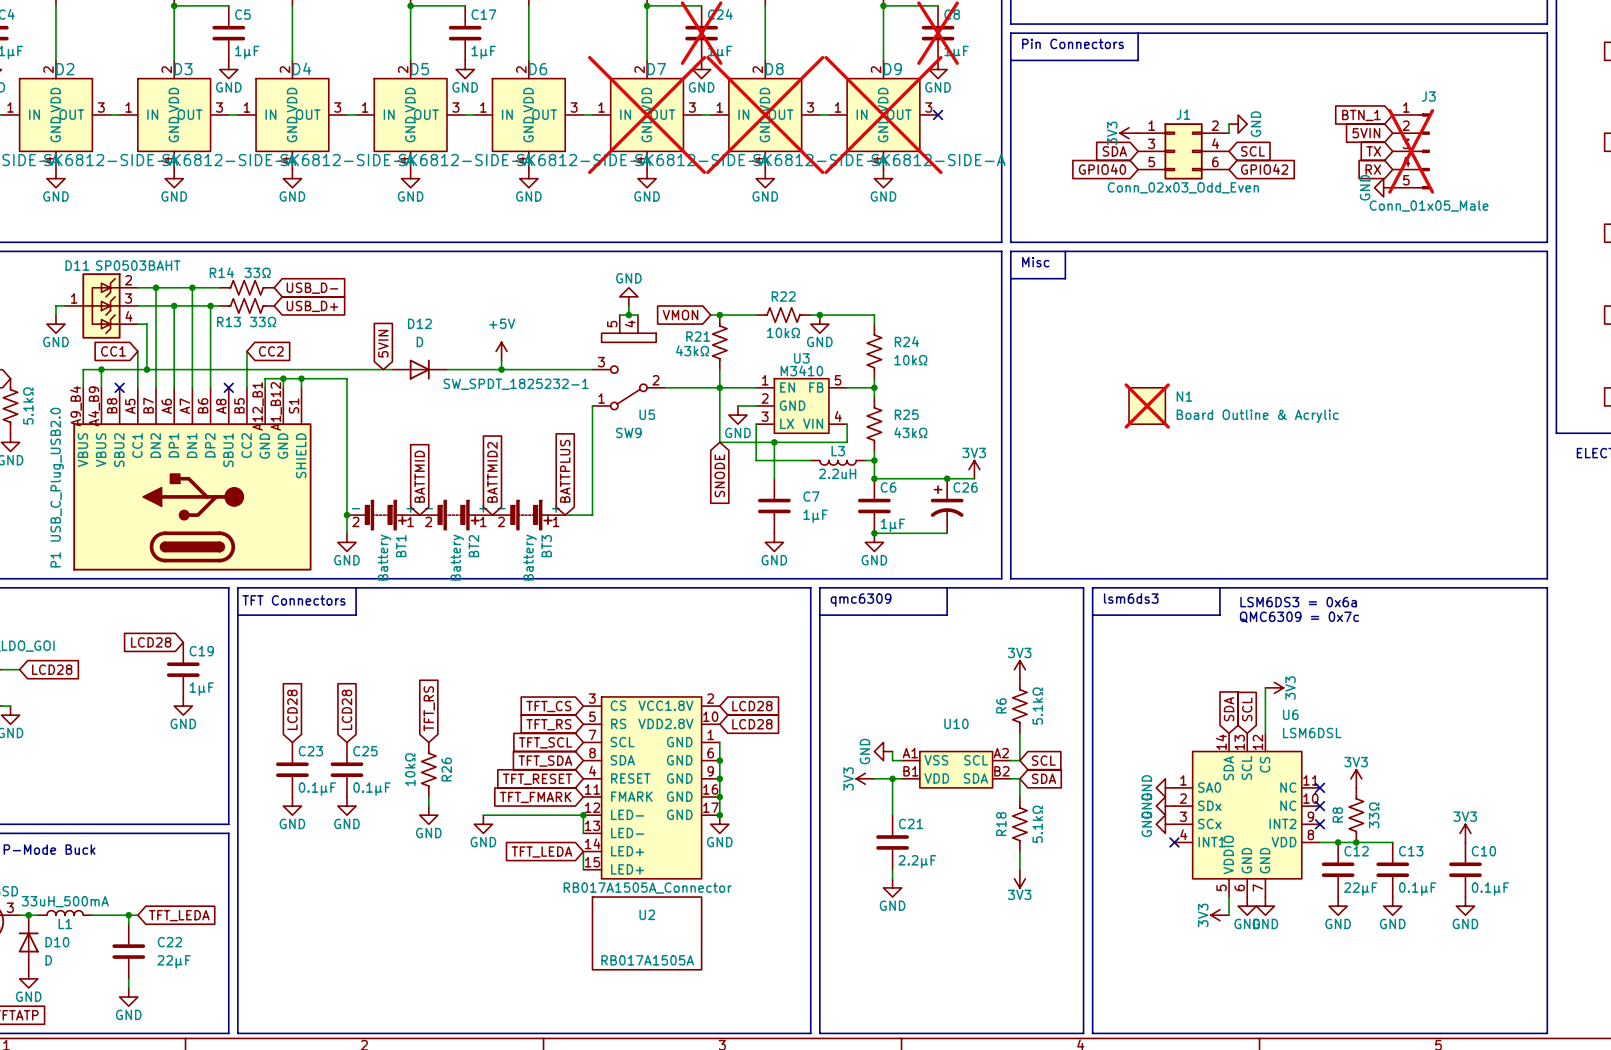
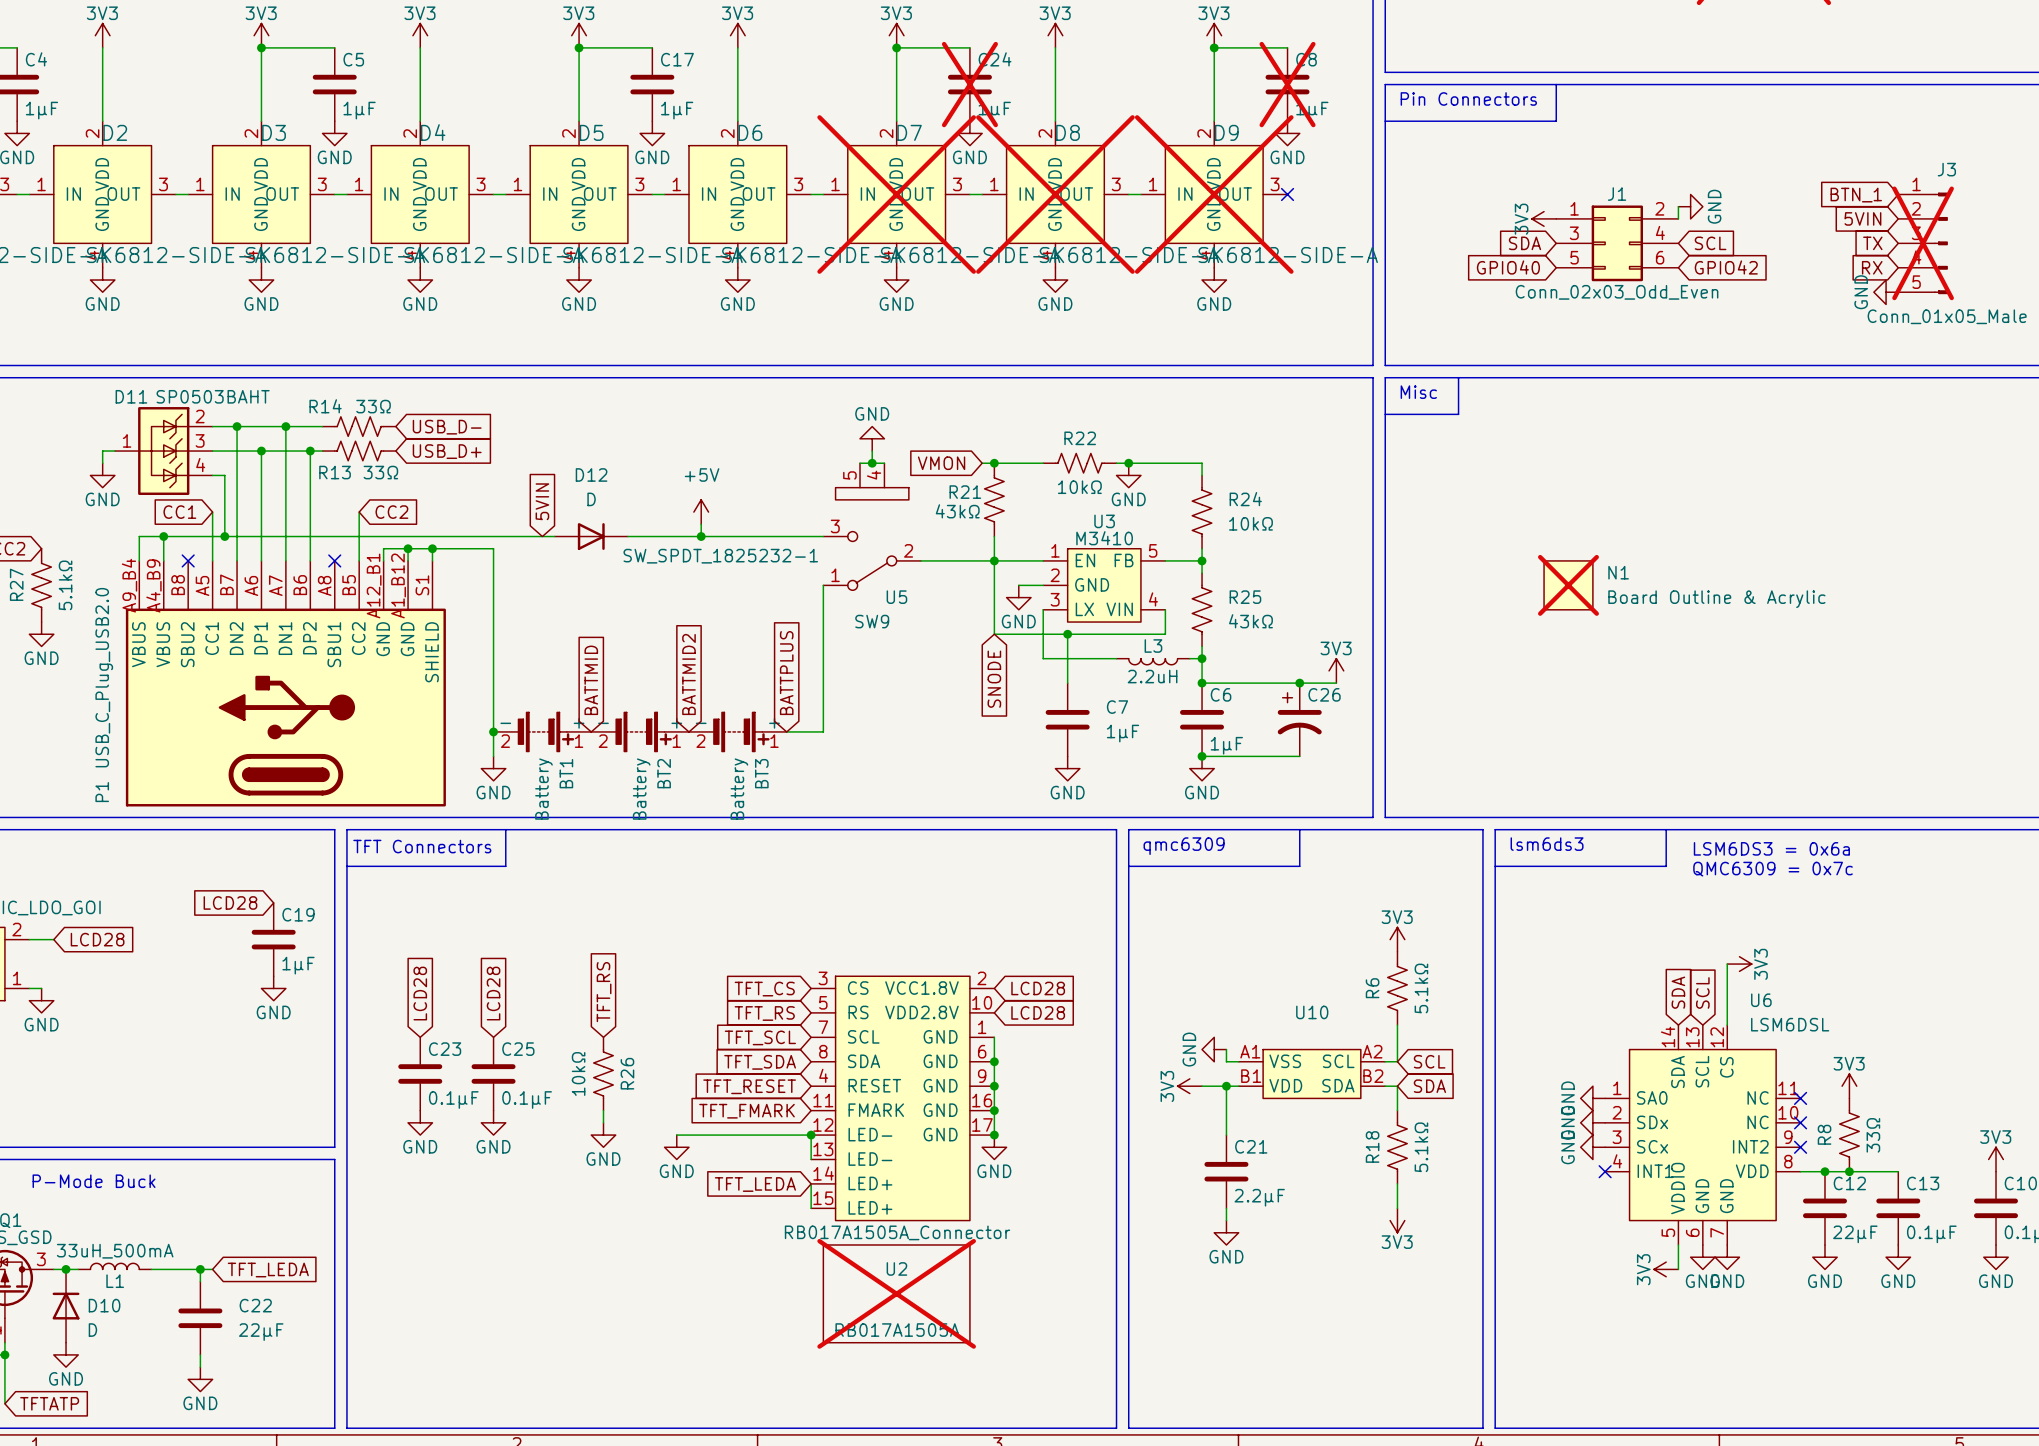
U2 do-not-place cross: none -> (896, 1293)

